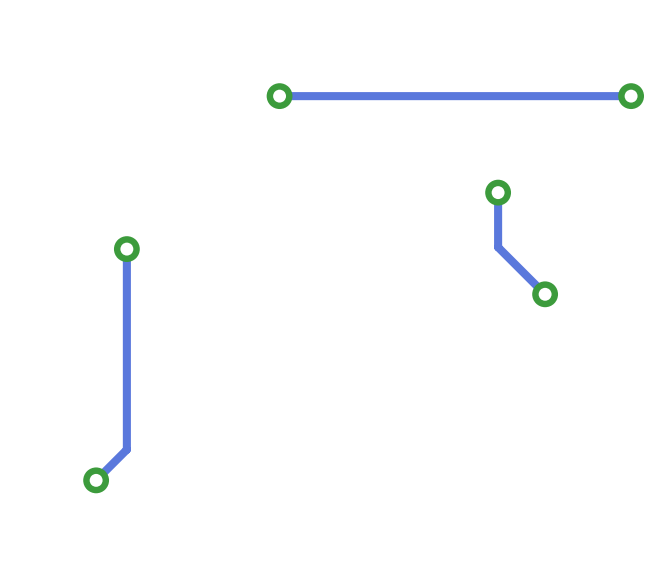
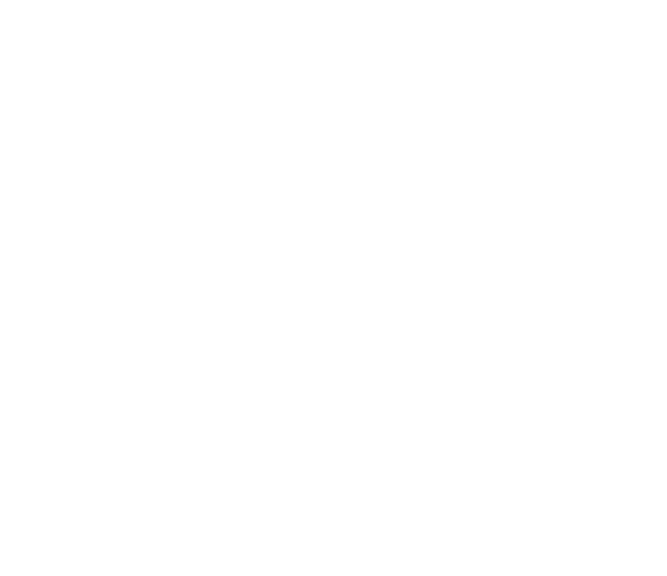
via: (279, 96) -> none
track: (631, 96) (279, 96) -> none
via: (631, 96) -> none
track: (498, 192) (498, 247) (545, 294) -> none
via: (498, 192) -> none
track: (126, 249) (126, 449) (96, 480) -> none
via: (126, 249) -> none
via: (545, 294) -> none
via: (96, 480) -> none

